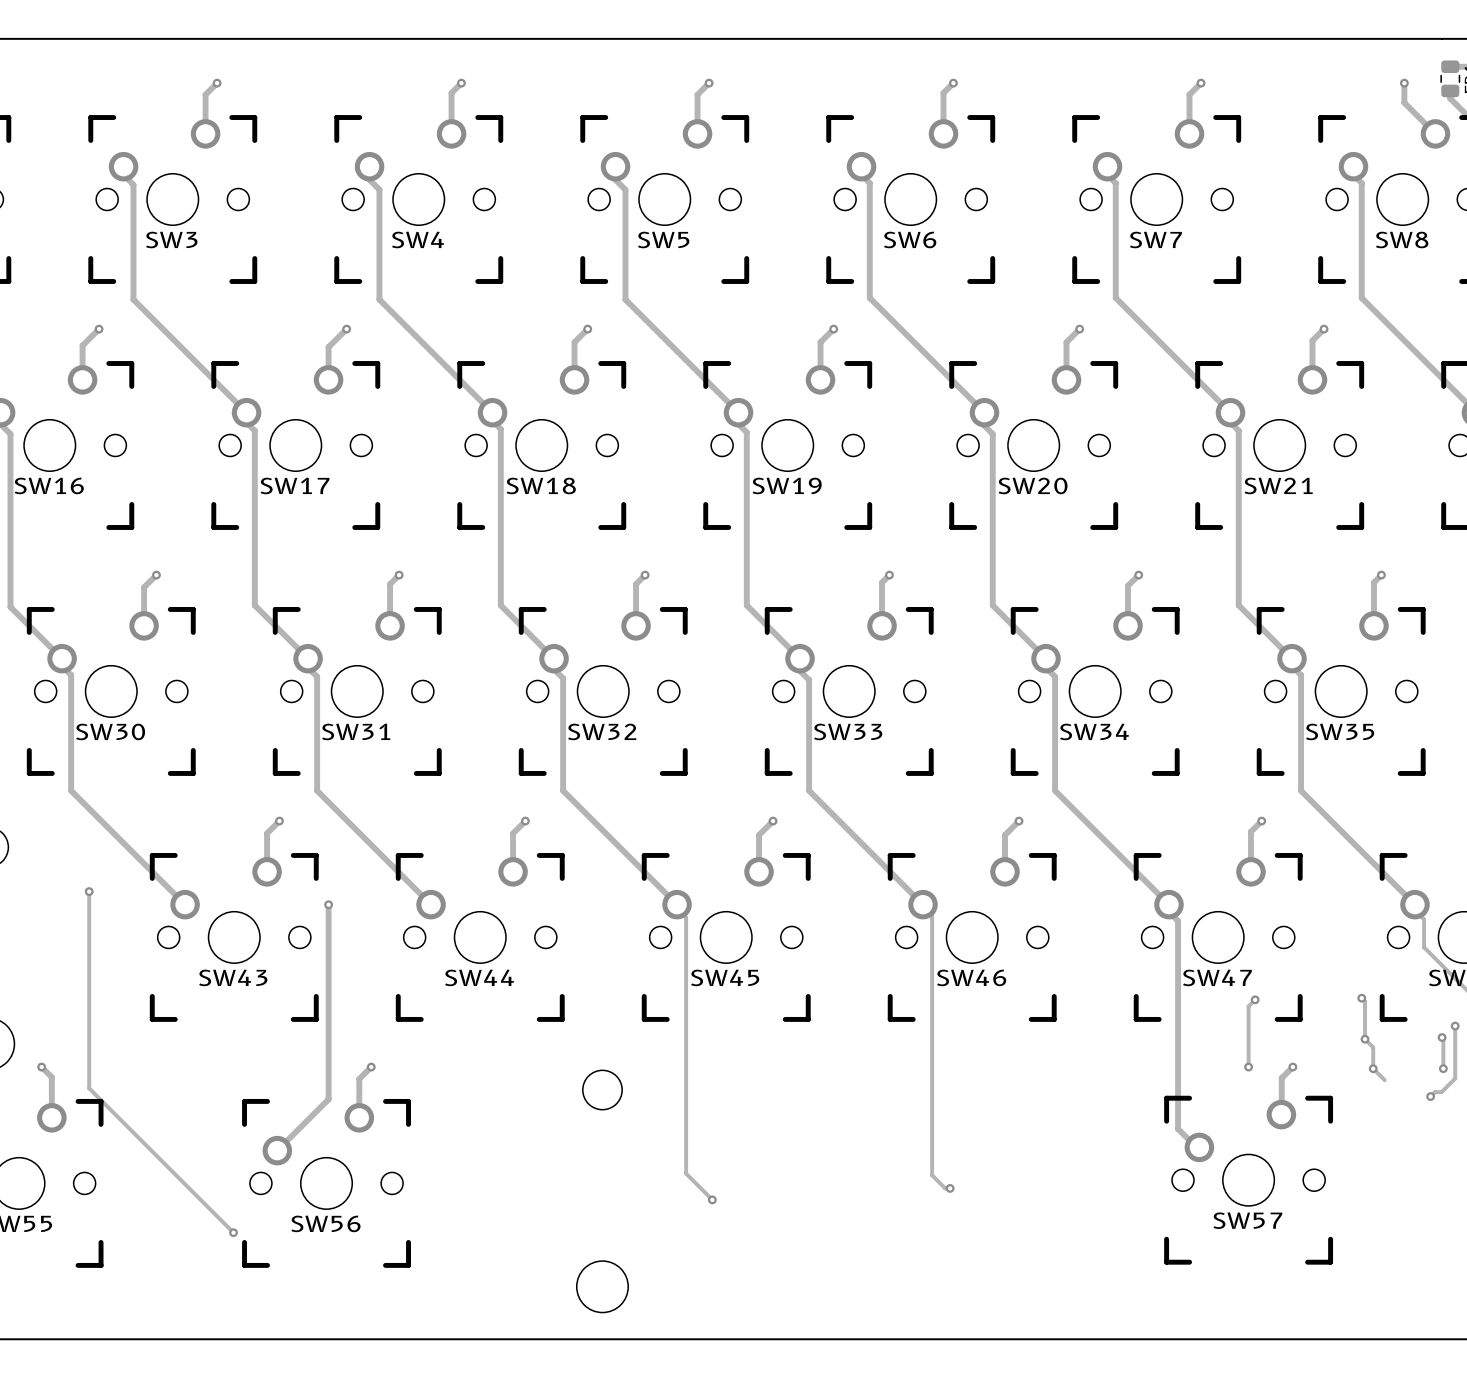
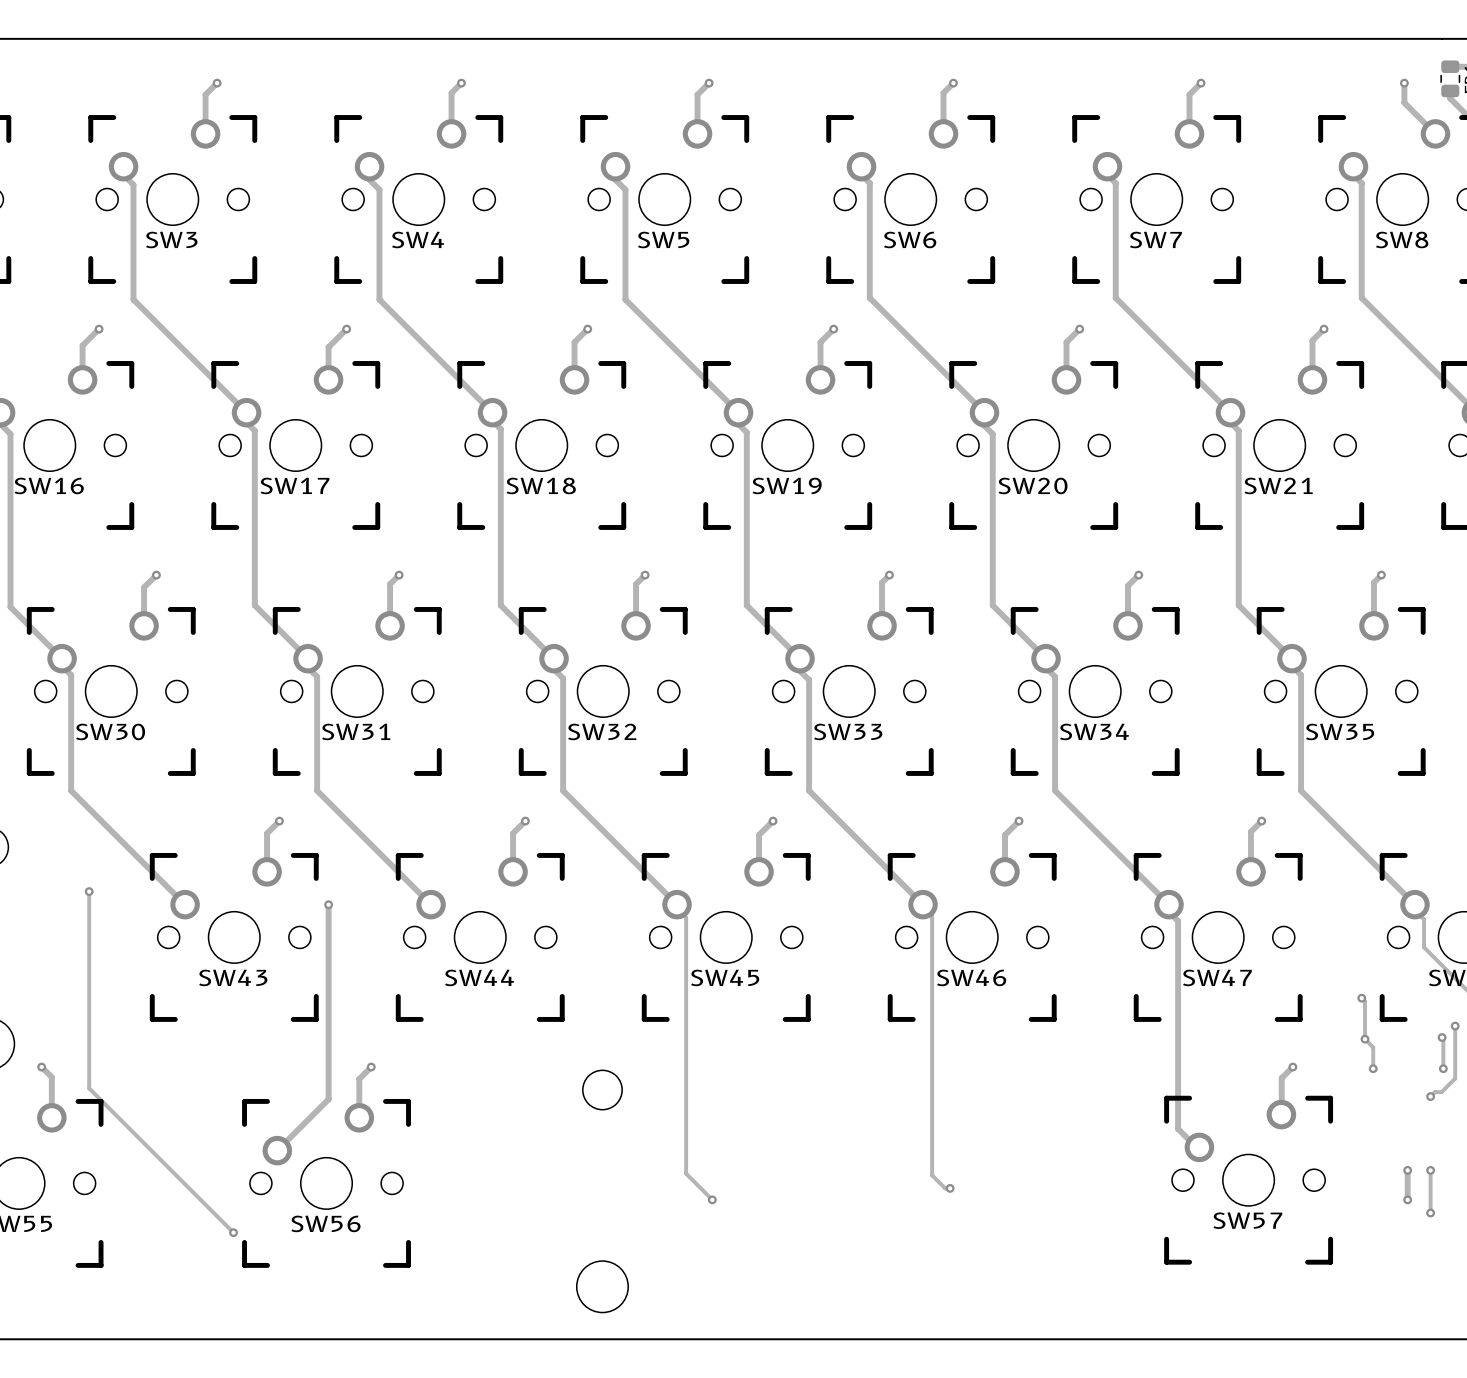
track: (1255, 999) (1248, 1006) (1248, 1067) -> none
via: (1255, 999) -> none
via: (1248, 1067) -> none
track: (1373, 1068) (1384, 1080) -> none
track: none -> (1407, 1170) (1407, 1199)
via: none -> (1407, 1170)
track: none -> (1430, 1170) (1430, 1213)
via: none -> (1430, 1170)
via: none -> (1407, 1199)
via: none -> (1430, 1213)

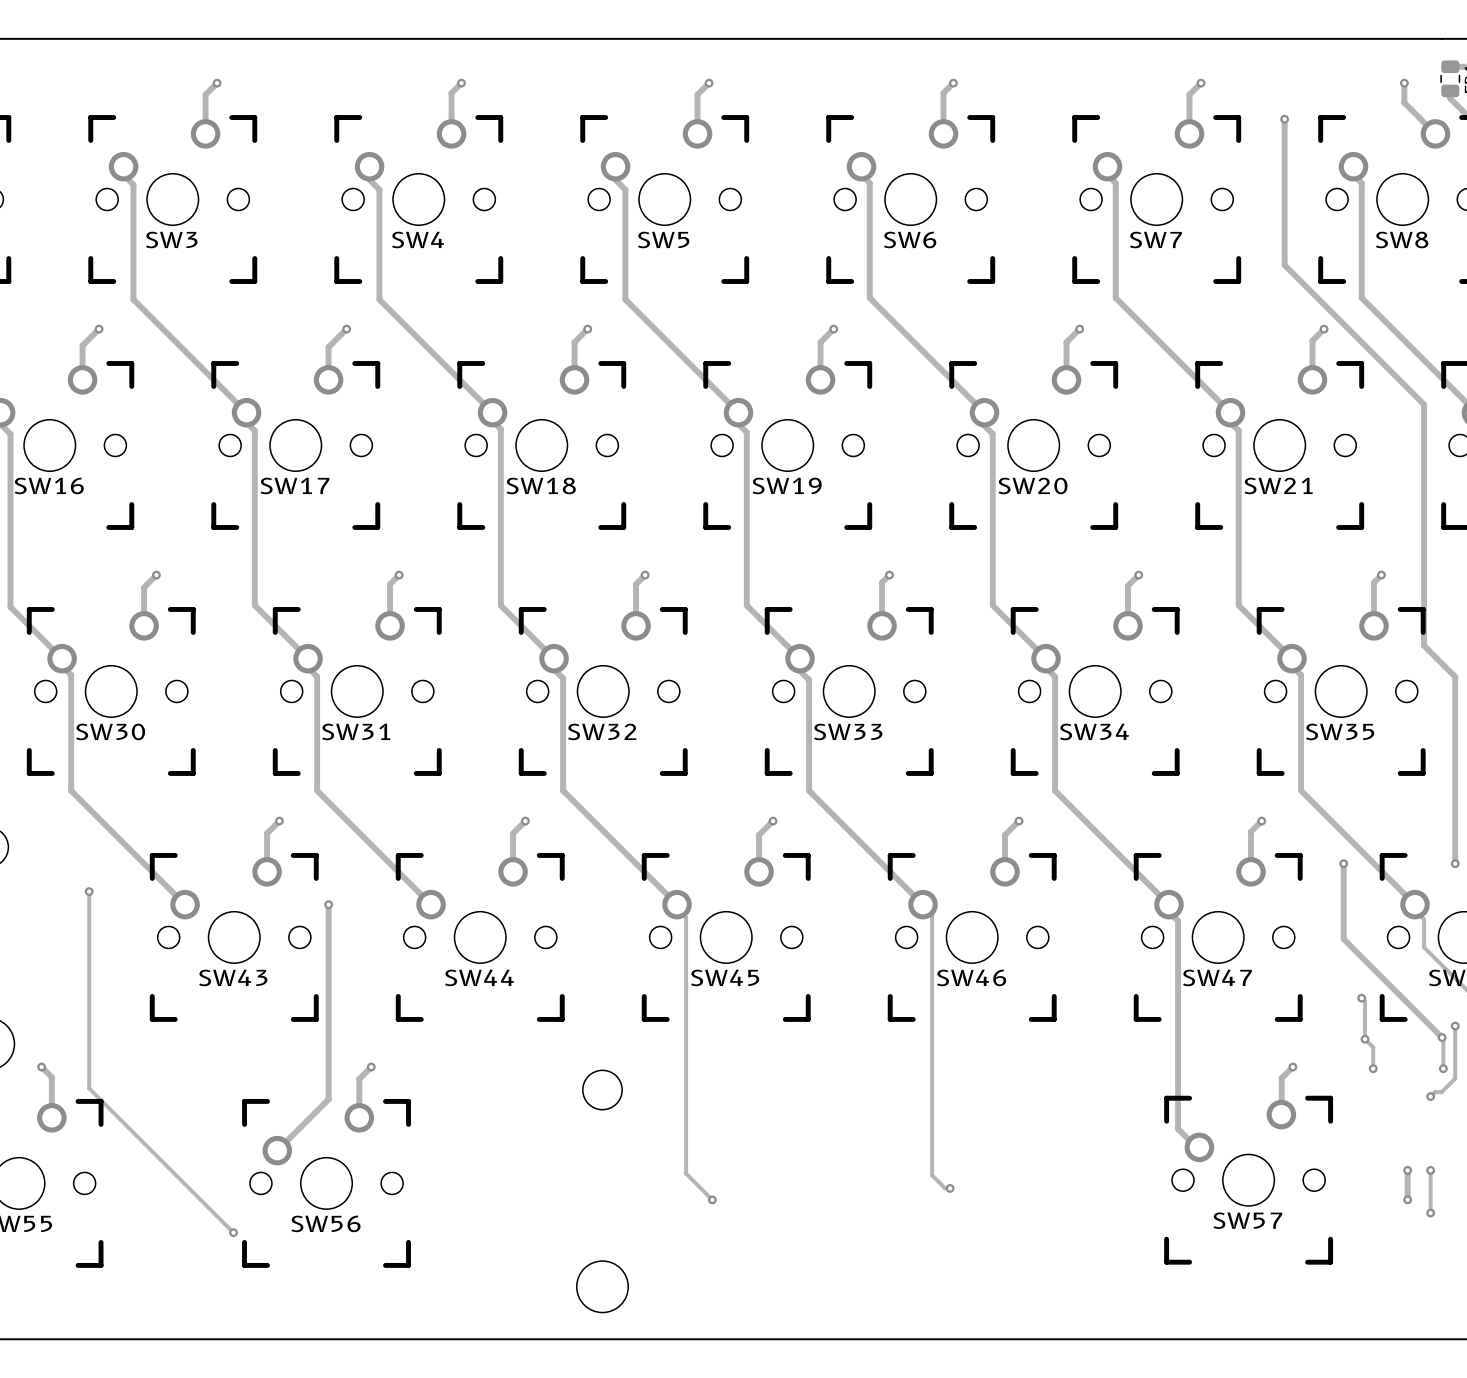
track: none -> (1284, 119) (1284, 265) (1424, 404) (1424, 645) (1455, 676) (1455, 863)
via: none -> (1284, 119)
track: none -> (1343, 863) (1343, 939) (1442, 1037)
via: none -> (1343, 863)
via: none -> (1455, 863)

